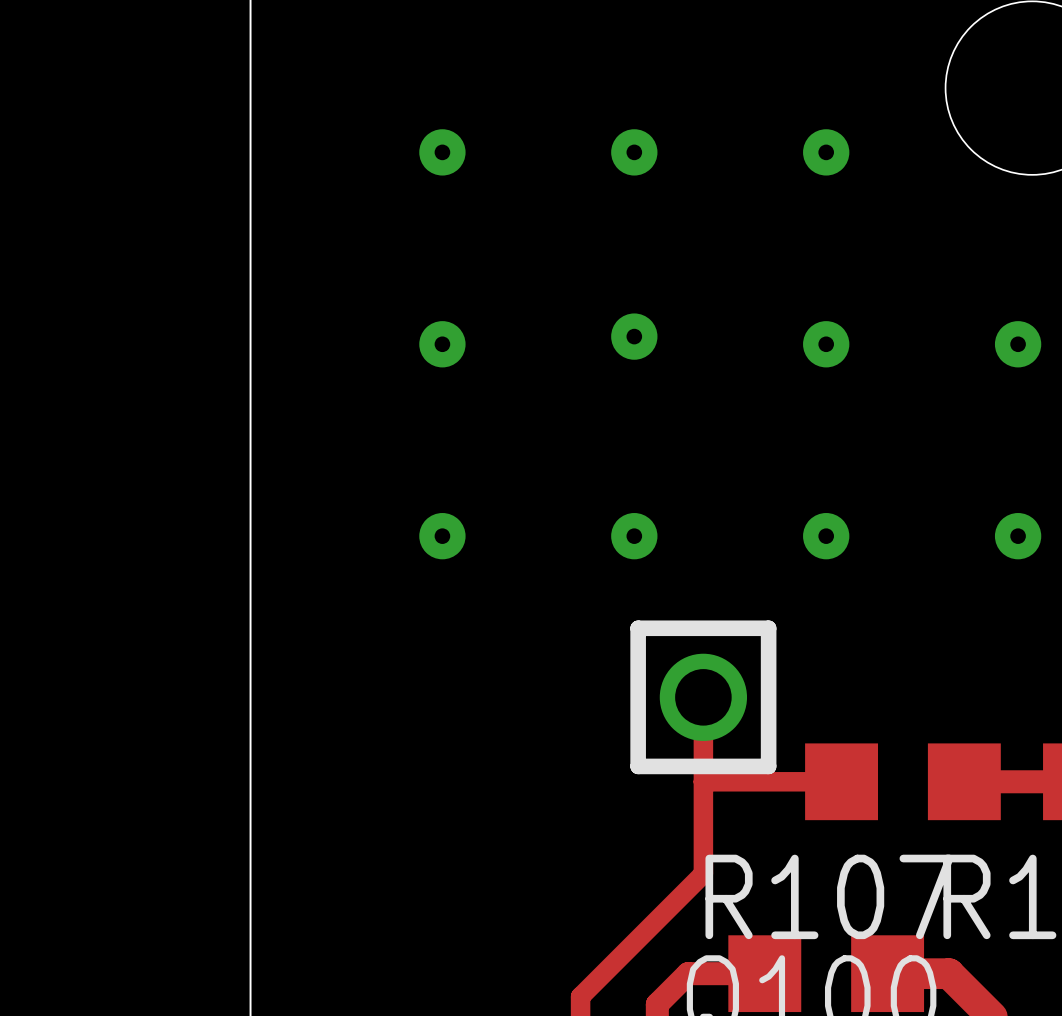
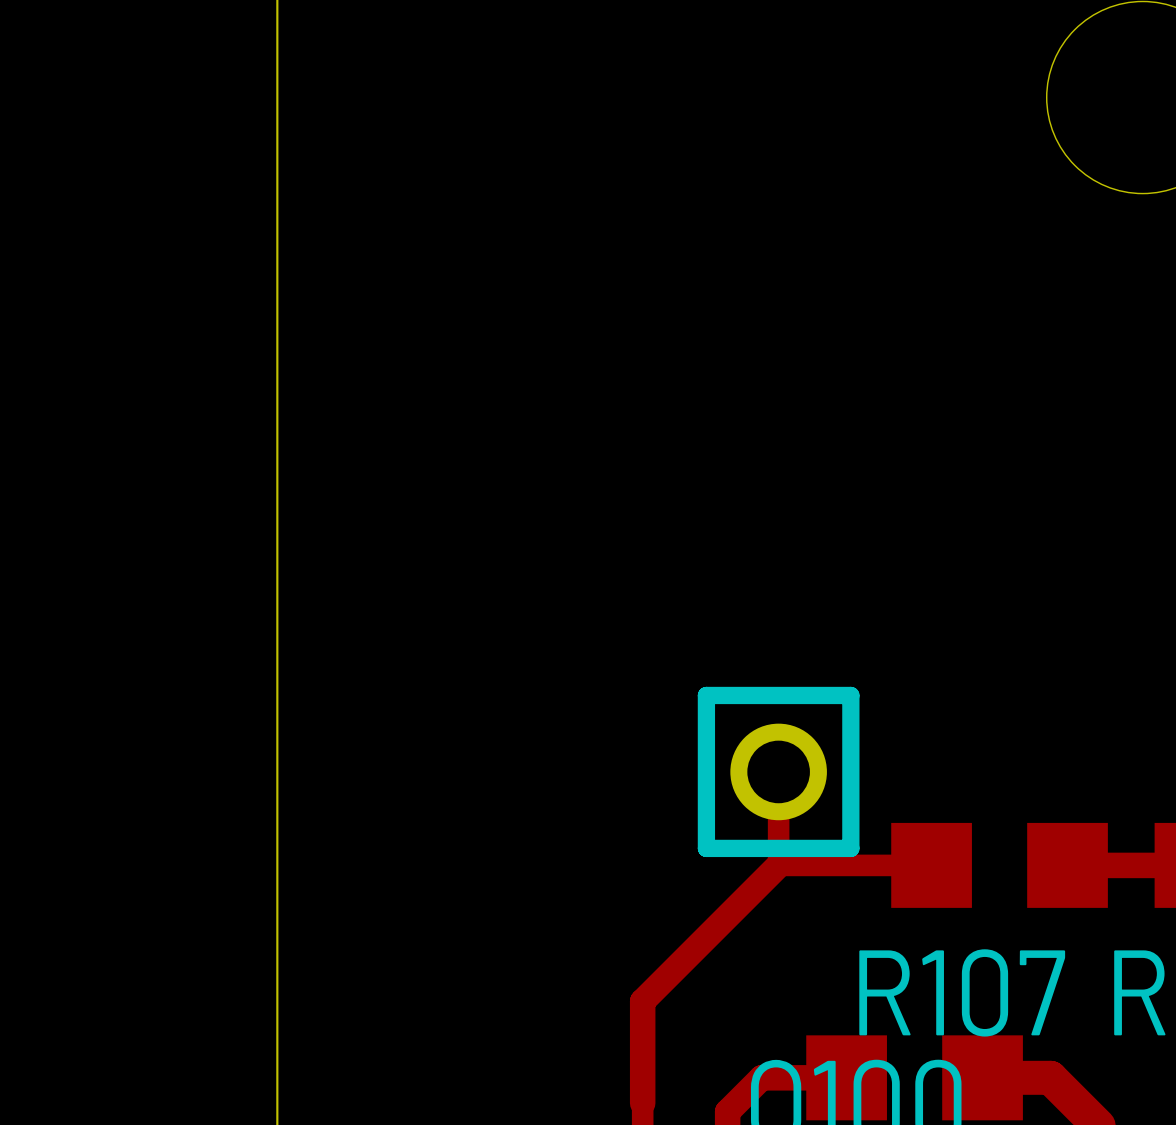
via: (442, 152) -> none
via: (634, 152) -> none
via: (826, 152) -> none
via: (634, 336) -> none
via: (442, 344) -> none
via: (826, 344) -> none
via: (1018, 344) -> none
via: (442, 536) -> none
via: (634, 536) -> none
via: (826, 536) -> none
via: (1018, 536) -> none
top track: (703, 781) (703, 873) (580, 996) -> (778, 865) (642, 1001) (642, 1103)

